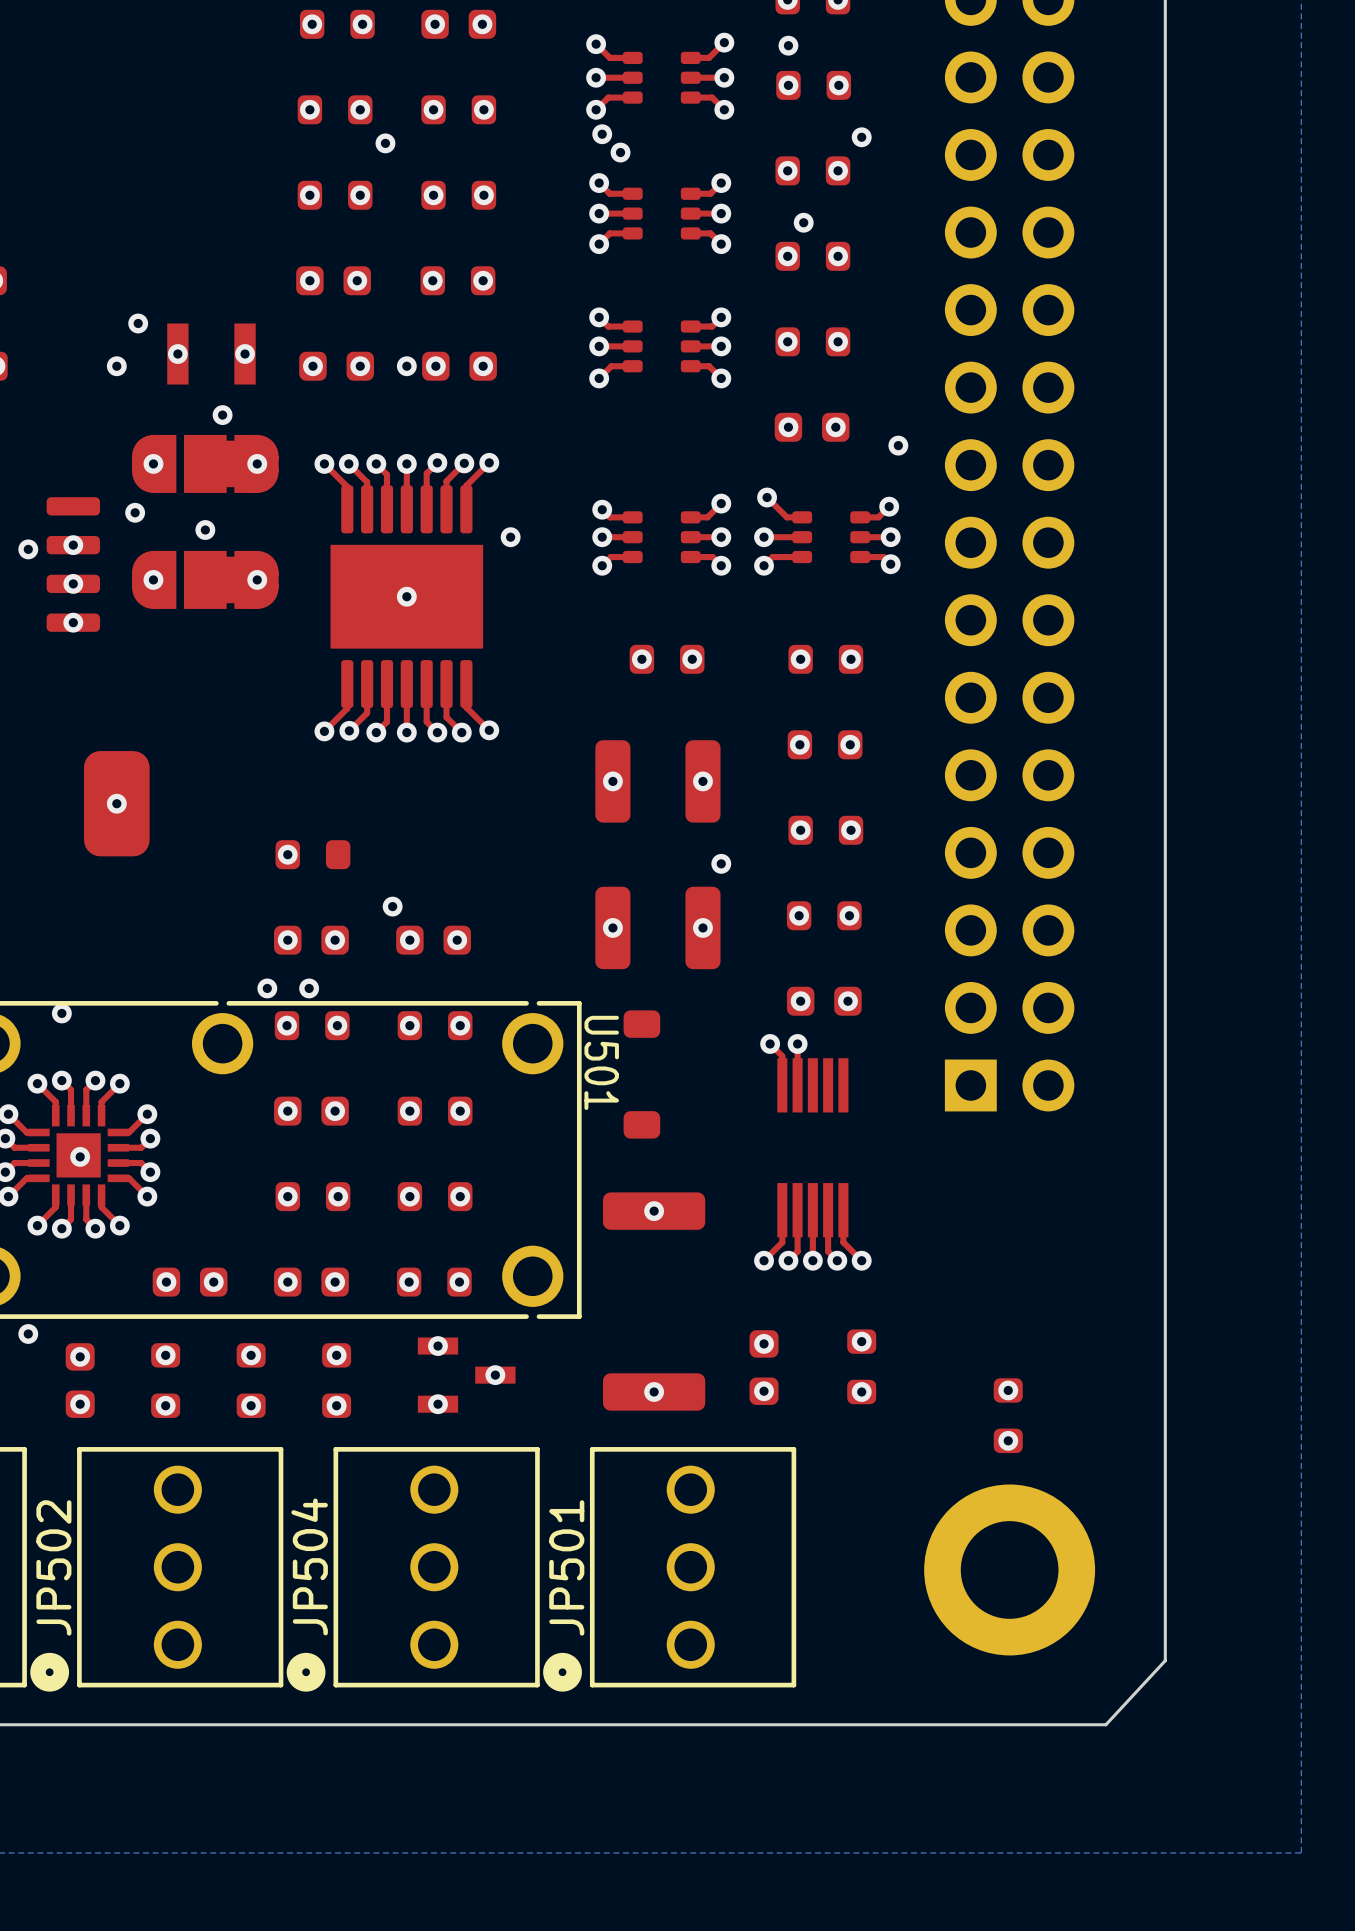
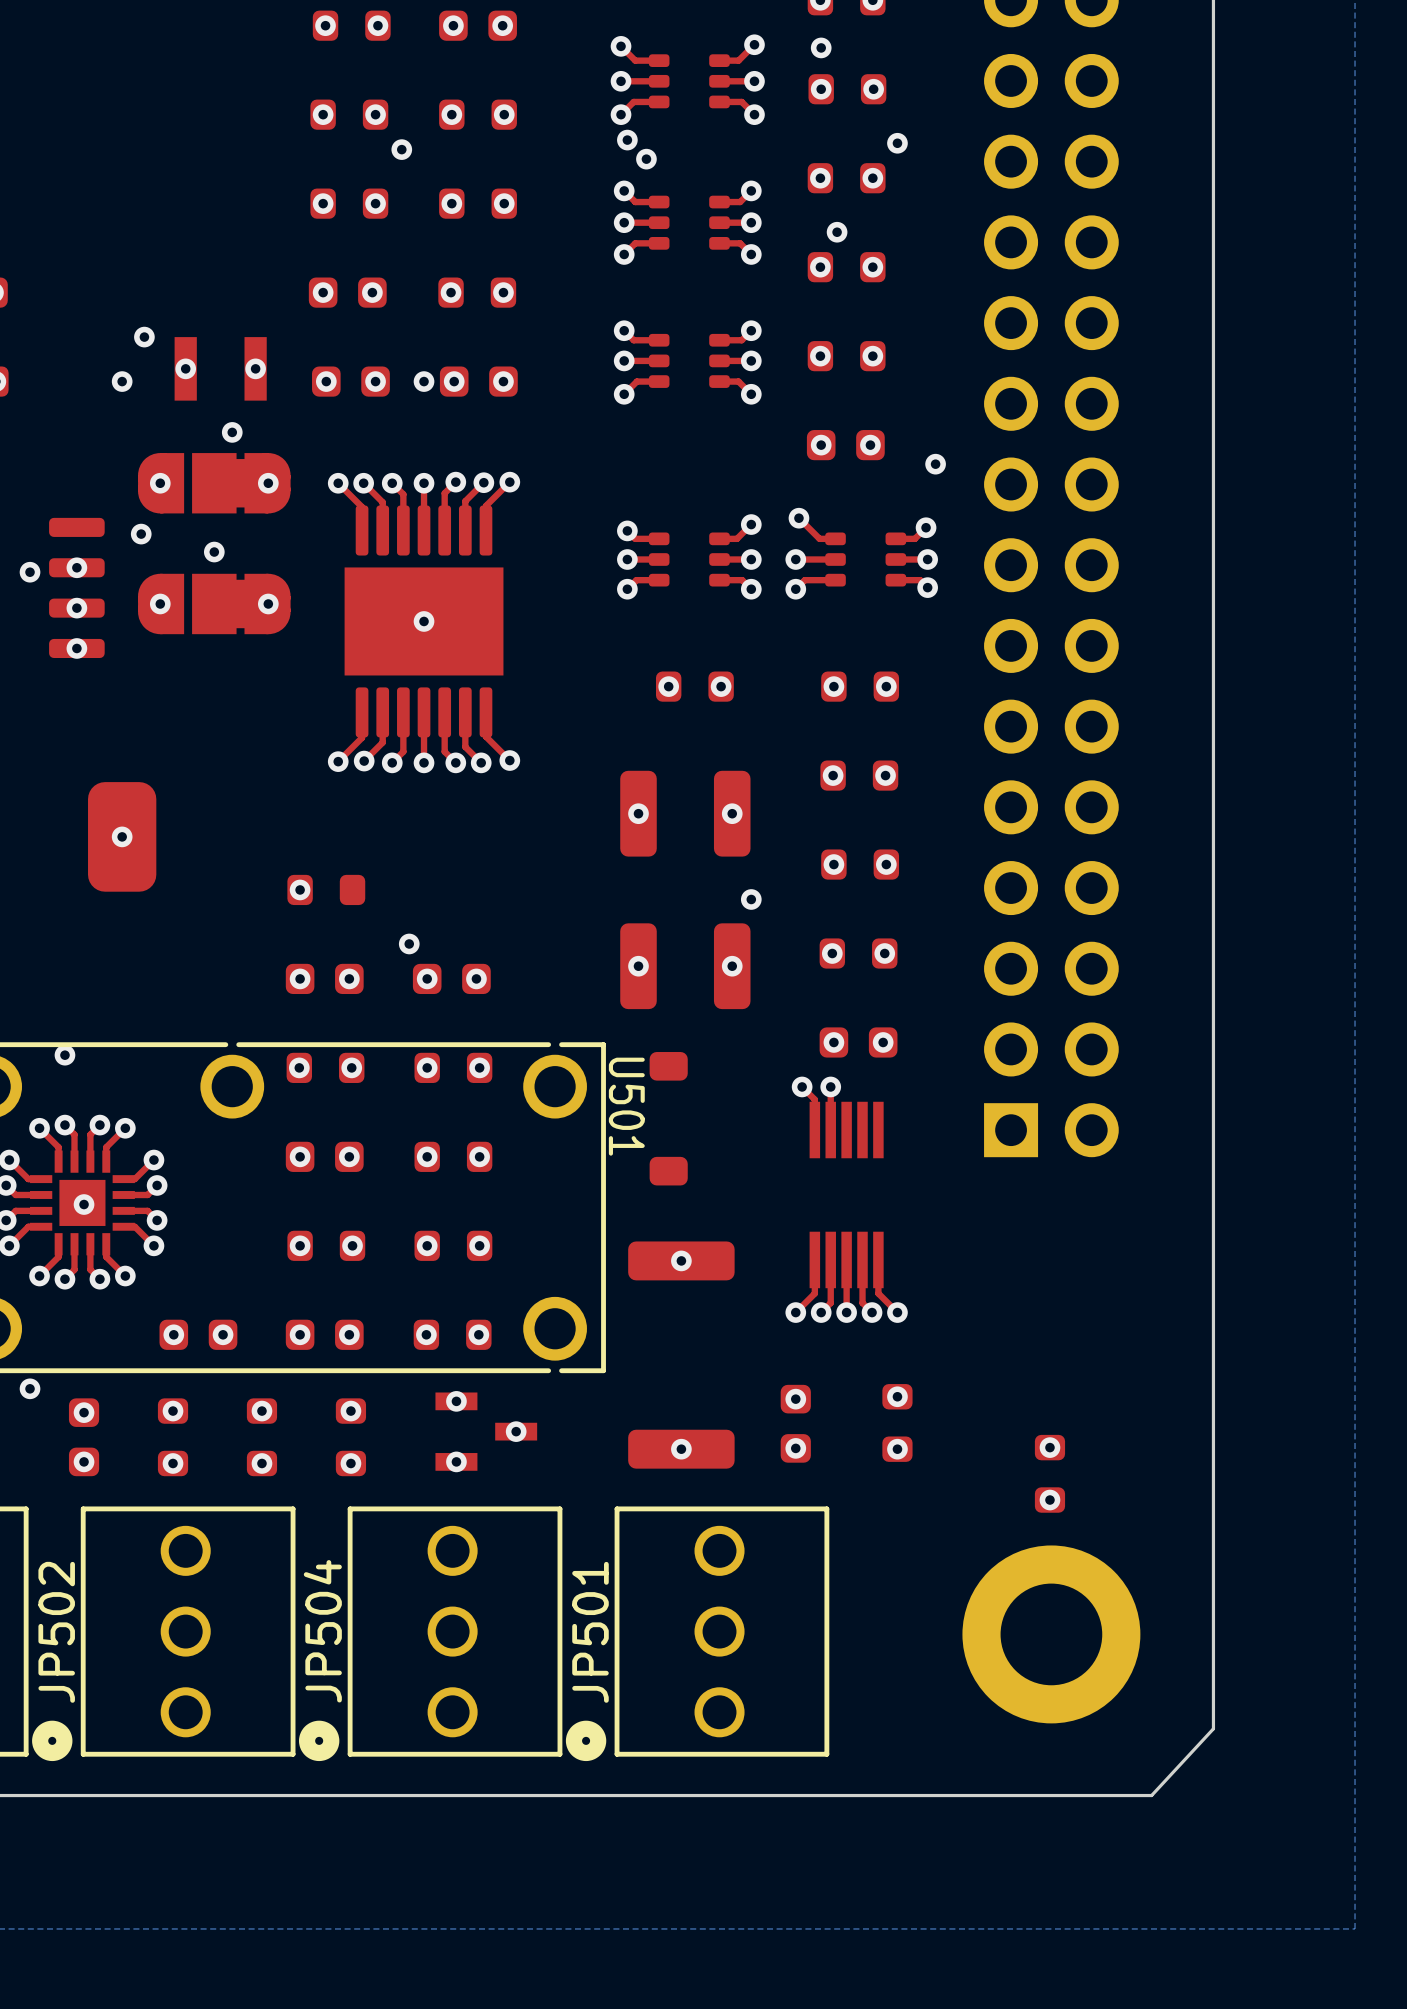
via: (510, 537) -> none
via: (267, 988) -> none
via: (309, 988) -> none

